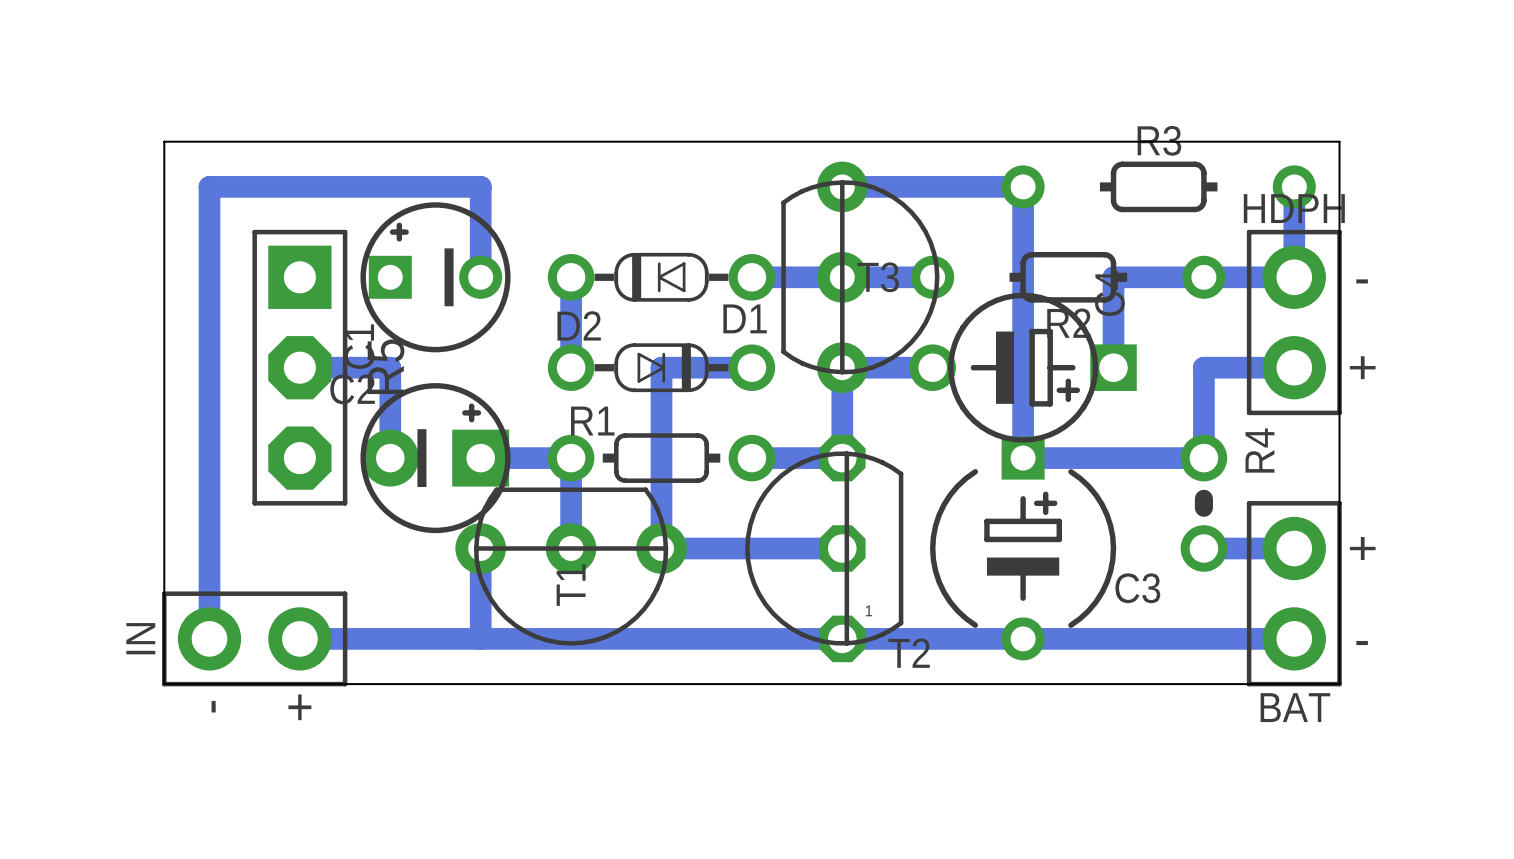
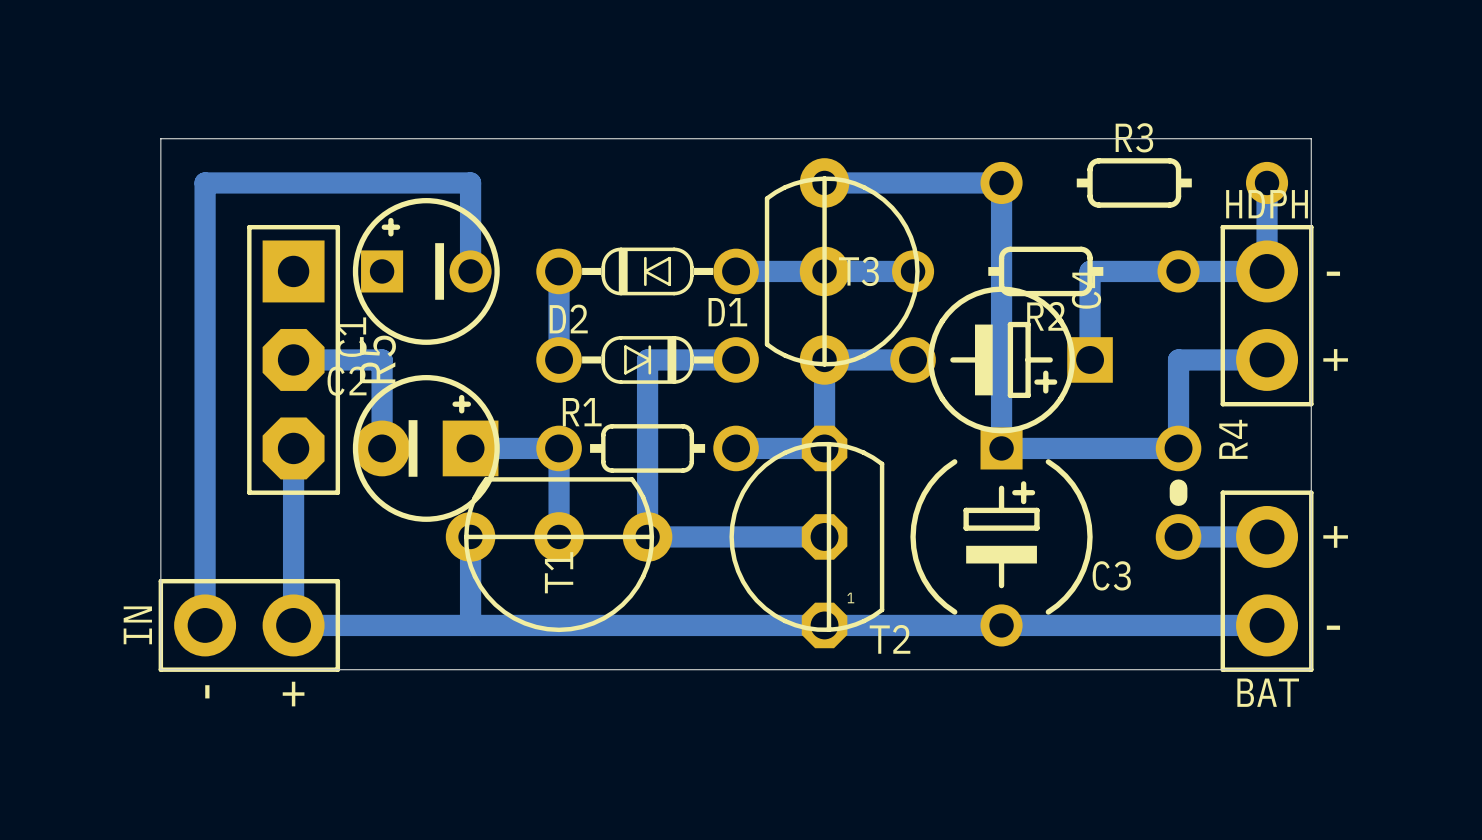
bottom track: none -> (293, 448) (293, 625)

